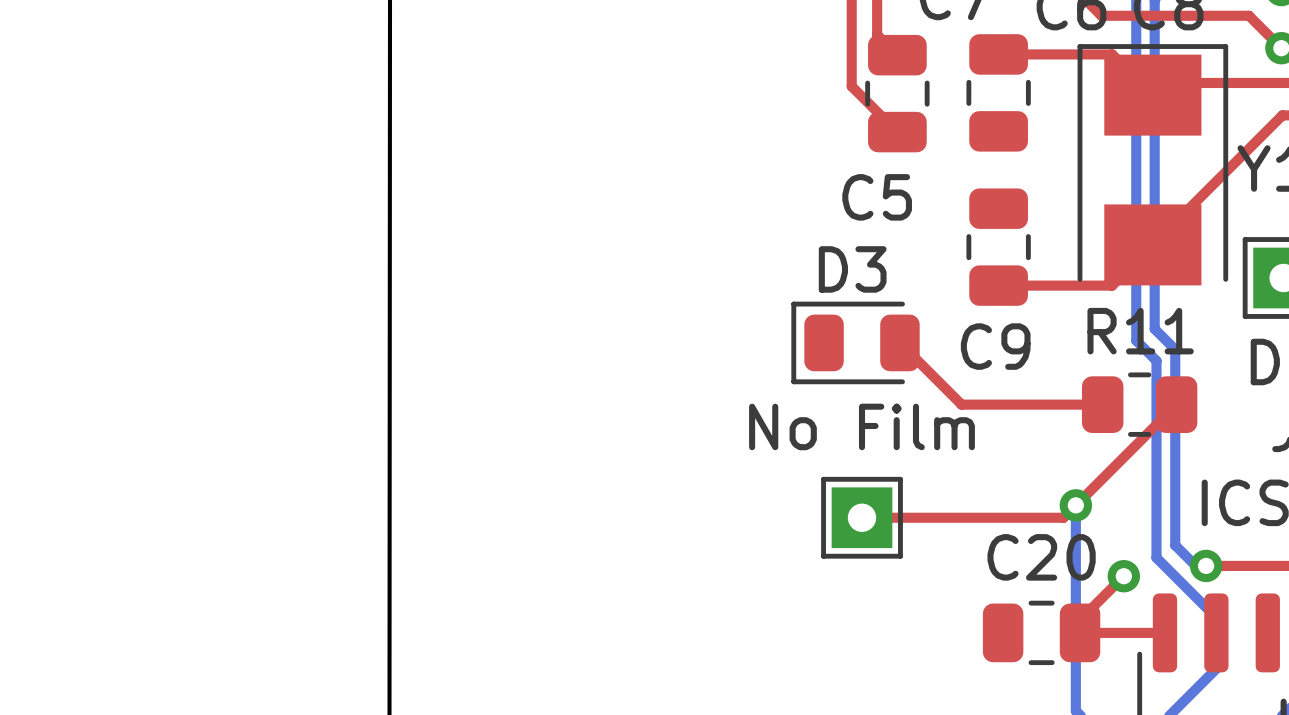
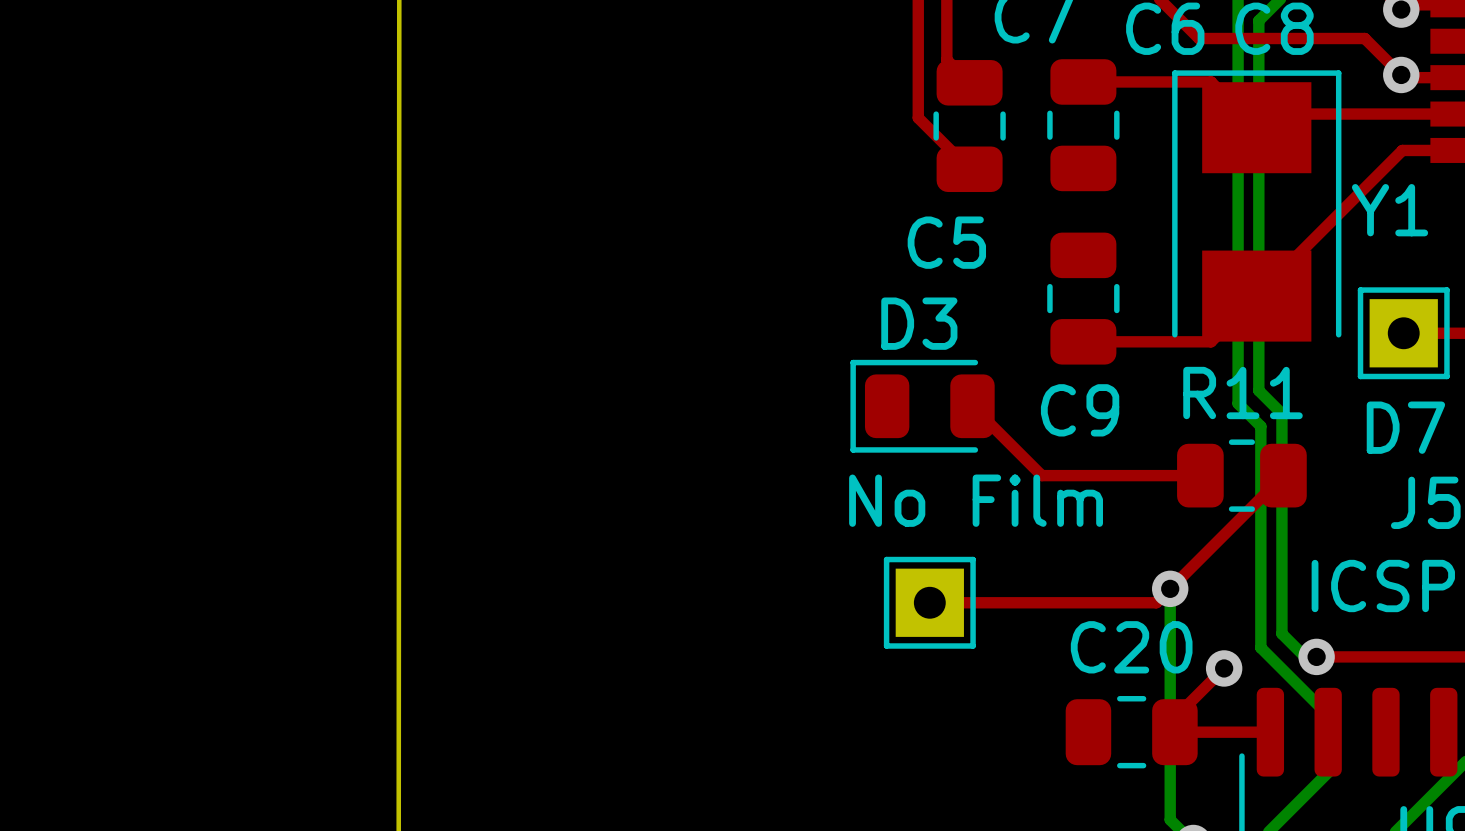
part text position: No Film (862, 426) -> No Film (976, 500)

